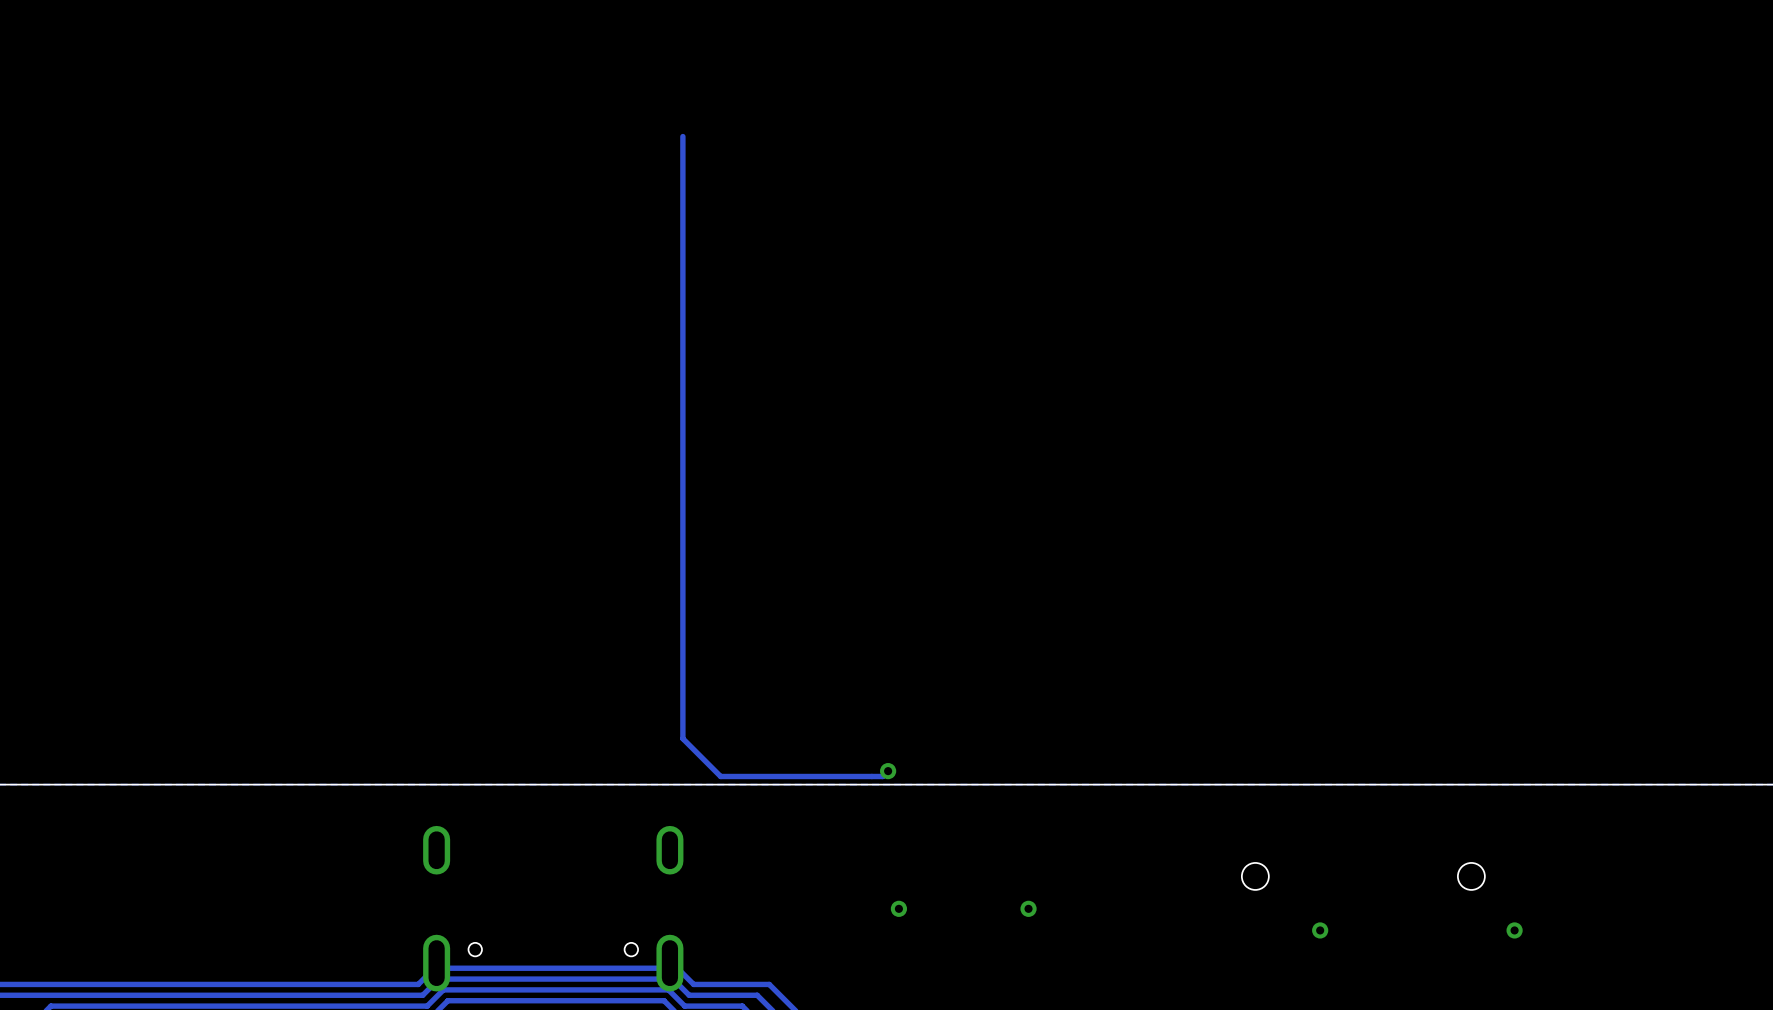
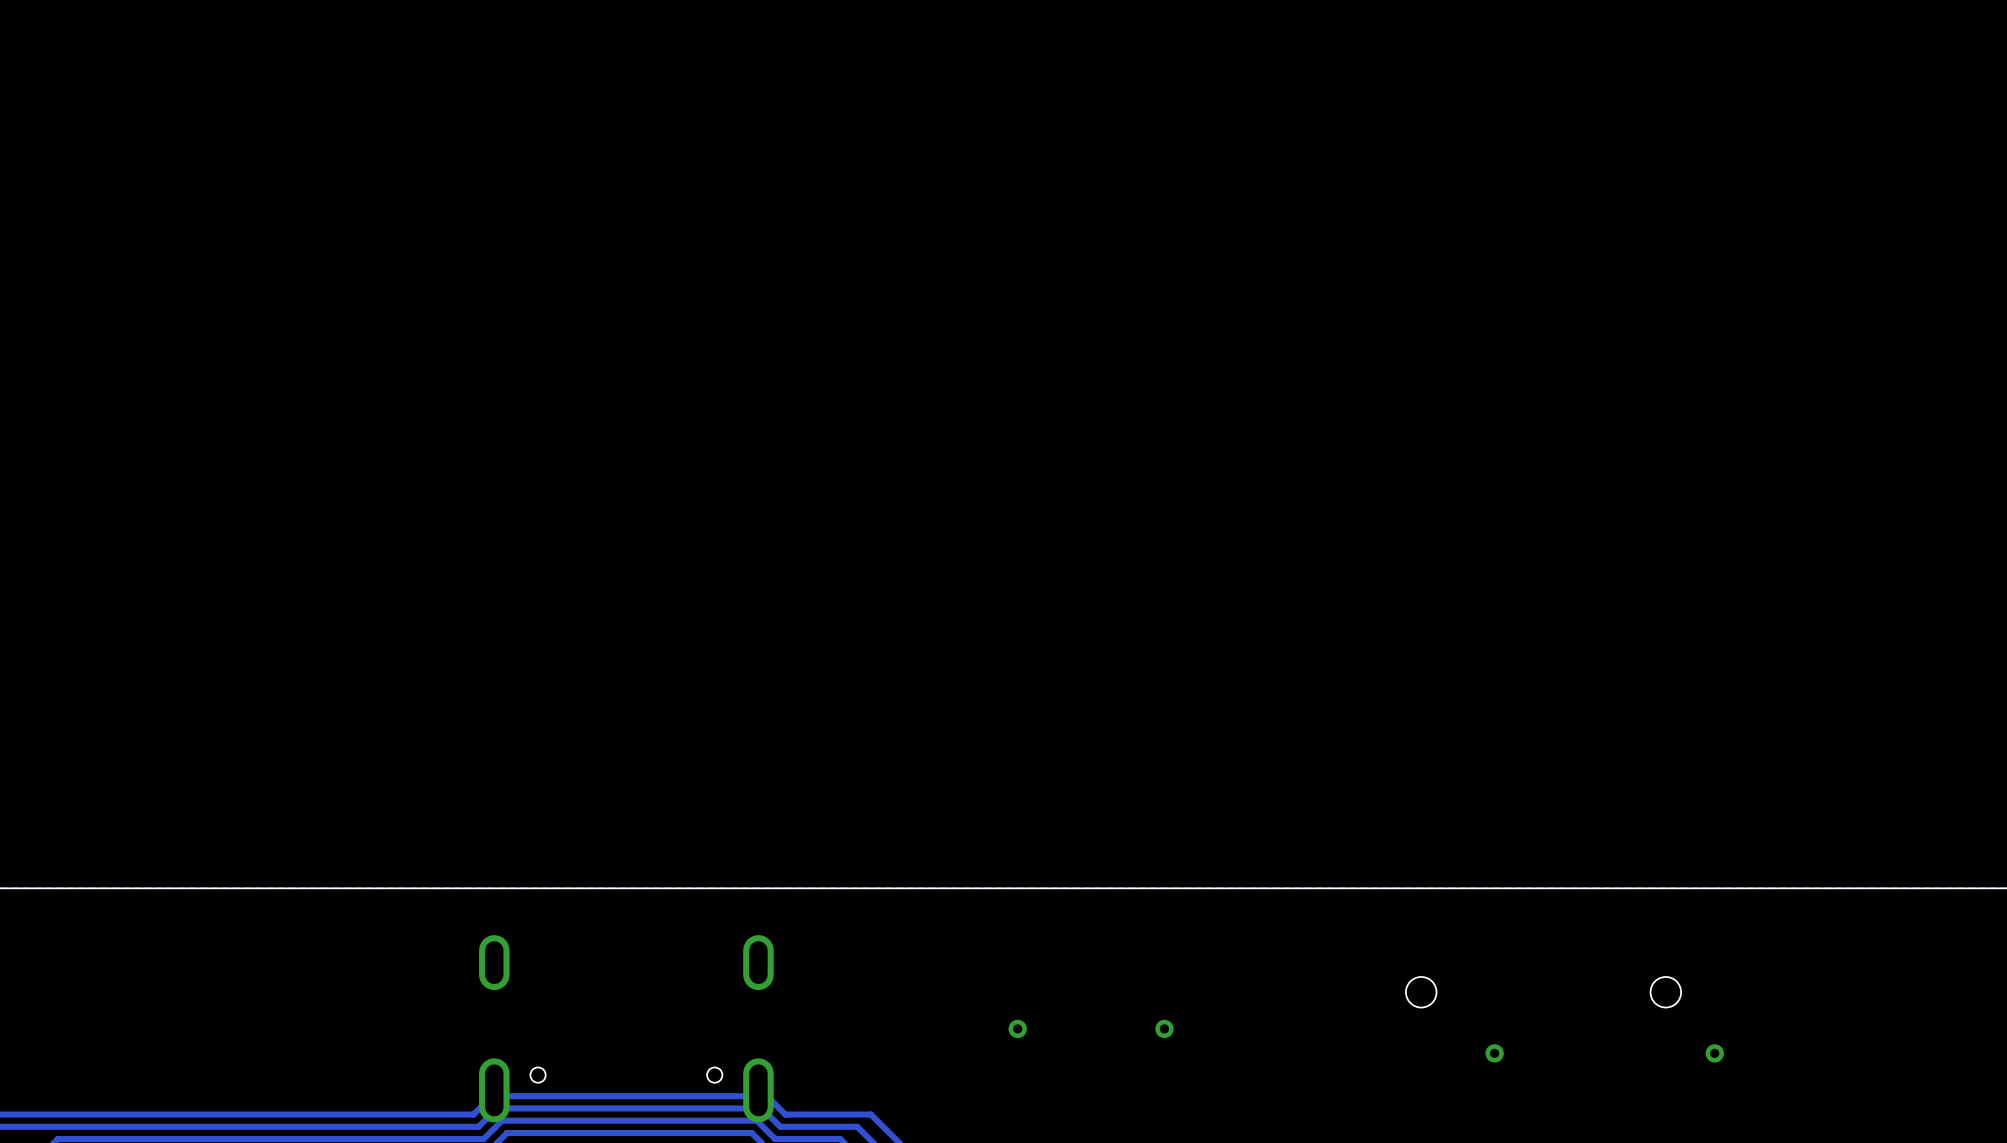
track: (682, 136) (682, 738) (720, 776) (882, 776) (888, 771) -> none
via: (888, 771) -> none

